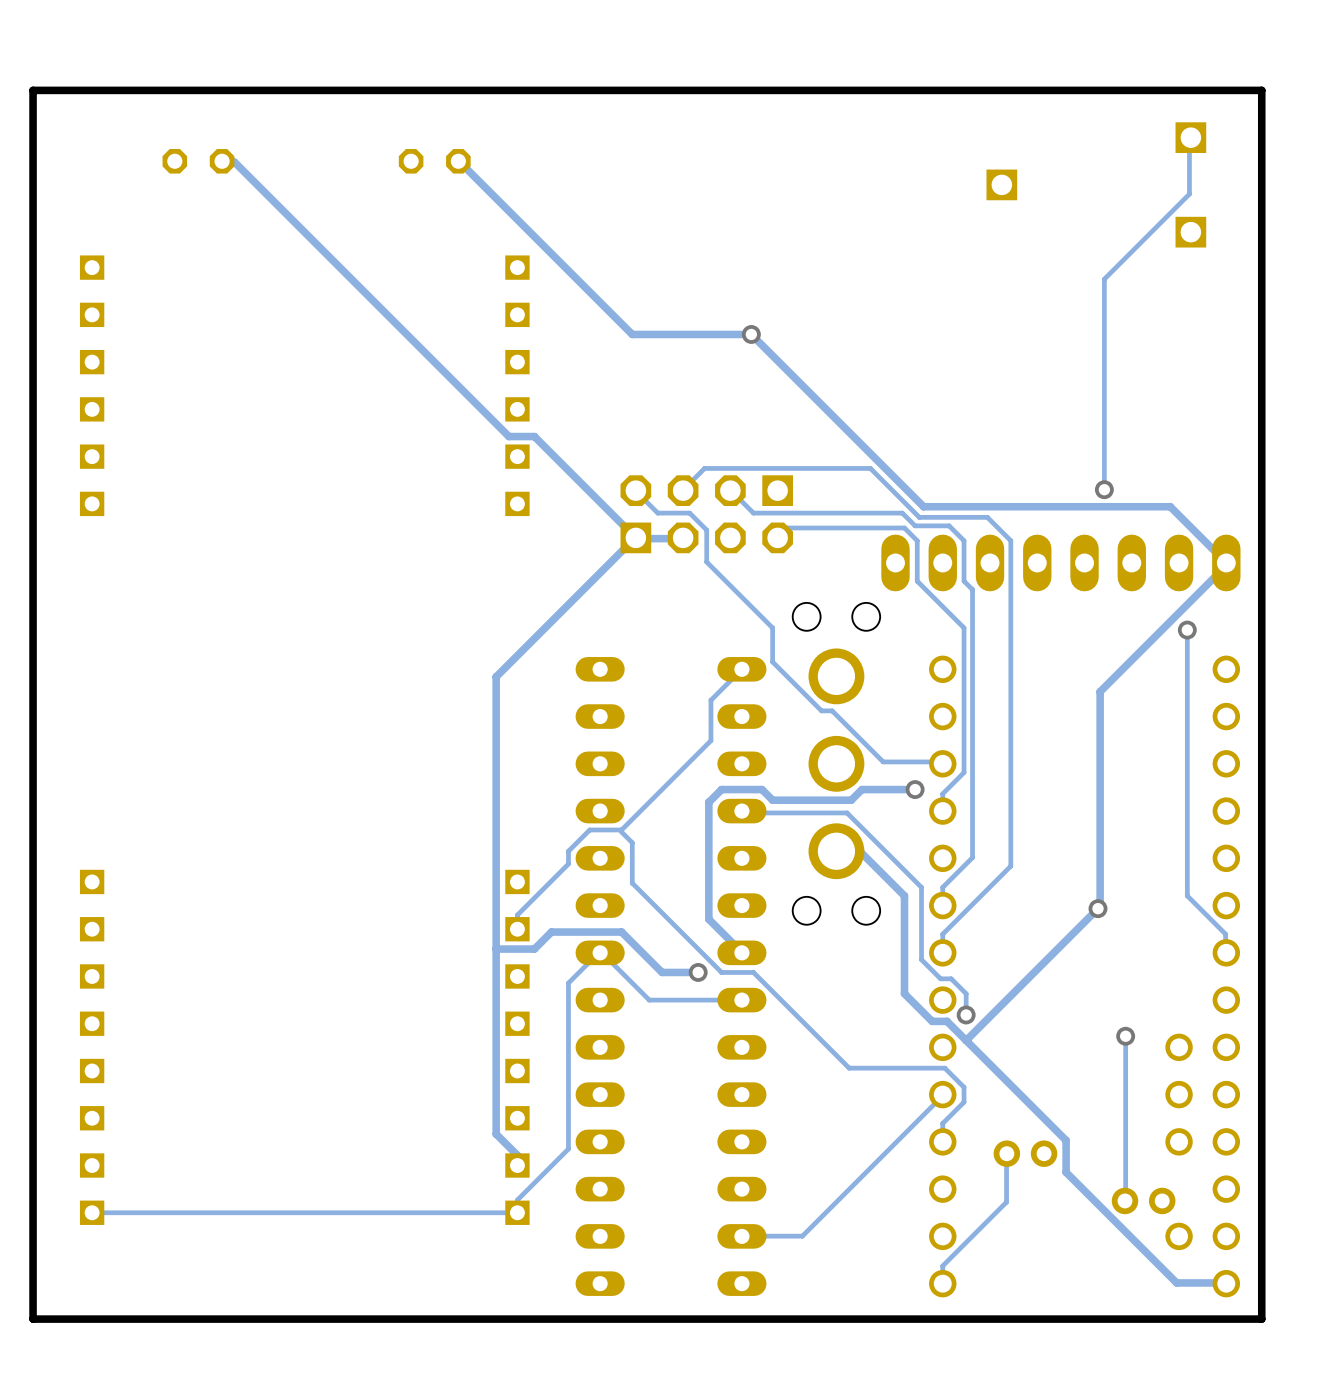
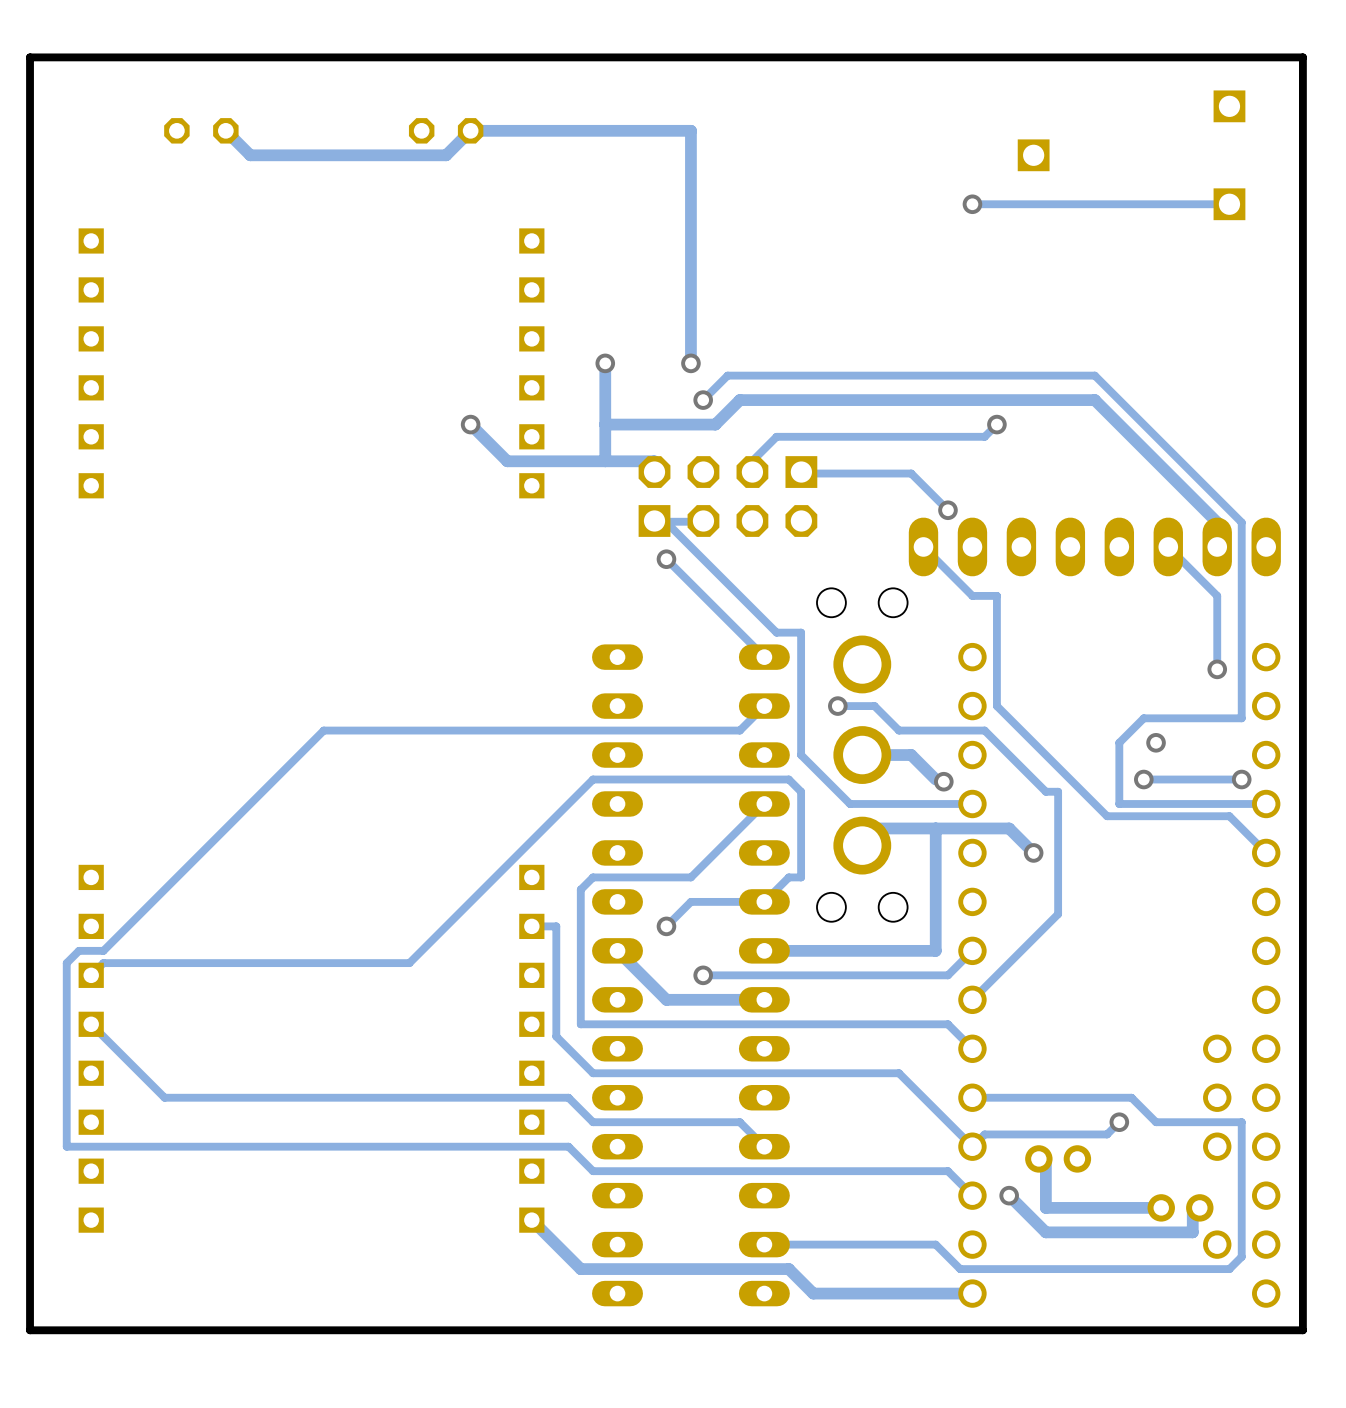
track: (1190, 137) (1189, 194) (1104, 279) (1104, 489) -> none
track: (222, 161) (234, 162) (508, 436) (534, 436) (635, 537) (496, 676) (496, 1134) (517, 1155) (517, 1165) -> (225, 130) (250, 155) (446, 155) (470, 130) (690, 130) (690, 363)
track: (458, 161) (632, 334) (751, 334) (923, 506) (1170, 506) (1226, 562) (1225, 566) (1100, 691) (1100, 906) (966, 1040) -> none
via: none -> (972, 204)
track: none -> (1229, 204) (972, 204)
via: (751, 334) -> none
track: none -> (605, 363) (605, 461)
via: none -> (605, 363)
via: none -> (690, 363)
track: none -> (703, 400) (727, 375) (1094, 375) (1241, 522) (1241, 718) (1143, 718) (1119, 742) (1119, 803) (1266, 803)
via: none -> (703, 400)
via: none -> (470, 424)
track: none -> (605, 424) (715, 424) (739, 400) (1094, 400) (1217, 522) (1217, 546)
via: none -> (996, 424)
via: (1104, 489) -> none
track: (635, 490) (657, 513) (689, 513) (706, 530) (706, 562) (772, 627) (772, 661) (821, 710) (832, 710) (883, 761) (942, 761) (942, 763) -> (654, 472) (654, 461) (507, 461) (470, 424)
track: (683, 490) (704, 468) (870, 468) (919, 517) (987, 517) (1010, 540) (1010, 866) (942, 934) (942, 952) -> (703, 975) (947, 975) (972, 950)
track: (730, 490) (753, 513) (902, 513) (915, 525) (949, 525) (964, 540) (964, 581) (972, 589) (972, 857) (942, 887) (942, 905) -> (752, 472) (752, 461) (776, 436) (984, 436) (996, 424)
track: none -> (801, 472) (911, 473) (947, 510)
via: none -> (947, 510)
track: (777, 537) (787, 528) (904, 528) (917, 540) (917, 581) (964, 627) (964, 772) (942, 793) (942, 811) -> (654, 520) (666, 522) (776, 632) (801, 632) (801, 755) (850, 803) (972, 803)
track: none -> (923, 546) (972, 595) (996, 595) (996, 706) (1107, 816) (1229, 816) (1266, 852)
track: none -> (1168, 546) (1217, 595) (1217, 669)
via: none -> (666, 559)
track: (1187, 630) (1187, 895) (1225, 934) (1226, 952) -> none
via position: (1187, 630) -> (1217, 669)
track: (741, 669) (710, 700) (710, 740) (621, 829) -> (764, 657) (666, 559)
track: none -> (764, 706) (739, 730) (323, 730) (103, 950) (78, 950) (66, 963) (66, 1146) (568, 1146) (593, 1171) (947, 1171) (972, 1195)
track: none -> (837, 706) (874, 706) (899, 730) (984, 730) (1045, 791) (1058, 791) (1058, 914) (972, 999)
via: none -> (837, 706)
via: none -> (1156, 742)
track: none -> (862, 755) (911, 755) (935, 779)
via: none -> (1143, 779)
track: none -> (1241, 779) (1143, 779)
via: none -> (1241, 779)
track: (915, 789) (861, 789) (851, 800) (772, 800) (762, 789) (721, 789) (708, 802) (708, 919) (741, 952) -> (935, 828) (935, 950) (764, 950)
track: (741, 811) (742, 812) (847, 812) (921, 887) (921, 959) (940, 978) (951, 978) (966, 993) (966, 1014) -> (764, 803) (690, 877) (593, 877) (580, 889) (580, 1024) (947, 1024) (972, 1048)
track: (621, 829) (589, 829) (568, 851) (568, 864) (517, 915) (517, 929) -> (1119, 1122) (1107, 1134) (984, 1134) (972, 1146) (899, 1073) (593, 1073) (556, 1036) (556, 926) (531, 926)
track: (621, 829) (632, 842) (632, 883) (721, 972) (753, 972) (849, 1068) (944, 1068) (964, 1087) (964, 1102) (942, 1123) (942, 1141) -> none
track: (836, 851) (859, 851) (904, 895) (904, 993) (932, 1021) (947, 1021) (1066, 1140) (1066, 1172) (1176, 1282) (1226, 1283) -> (862, 845) (862, 840) (874, 828) (1009, 828) (1033, 852)
via: none -> (1033, 852)
via: (1098, 908) -> none
track: none -> (666, 926) (690, 901) (764, 901) (788, 877) (801, 877) (801, 791) (788, 779) (593, 779) (409, 963) (103, 963) (91, 975)
via: none -> (666, 926)
track: (496, 949) (534, 949) (551, 932) (621, 932) (662, 972) (698, 972) -> none
via position: (698, 972) -> (703, 975)
track: (649, 1000) (602, 953) (598, 953) (568, 983) (568, 1148) (517, 1200) (517, 1212) (92, 1212) -> (668, 999) (617, 950)
track width: thin (741, 1000) (649, 1000) -> thick (764, 999) (668, 999)
via: (966, 1014) -> none
track: none -> (91, 1024) (164, 1097) (568, 1097) (593, 1122) (739, 1122) (764, 1146)
track: (1125, 1036) (1125, 1200) -> (1038, 1158) (1045, 1158) (1045, 1207) (1161, 1207)
via: (1125, 1036) -> none
track: (942, 1094) (802, 1236) (741, 1236) -> (972, 1097) (1131, 1097) (1156, 1122) (1241, 1122) (1241, 1256) (1229, 1269) (960, 1269) (935, 1244) (764, 1244)
via: none -> (1119, 1122)
track: (1006, 1153) (1006, 1202) (942, 1265) (942, 1283) -> (531, 1220) (580, 1269) (788, 1269) (813, 1293) (972, 1293)
track: none -> (1009, 1195) (1045, 1232) (1192, 1232) (1192, 1207) (1199, 1207)
via: none -> (1009, 1195)

